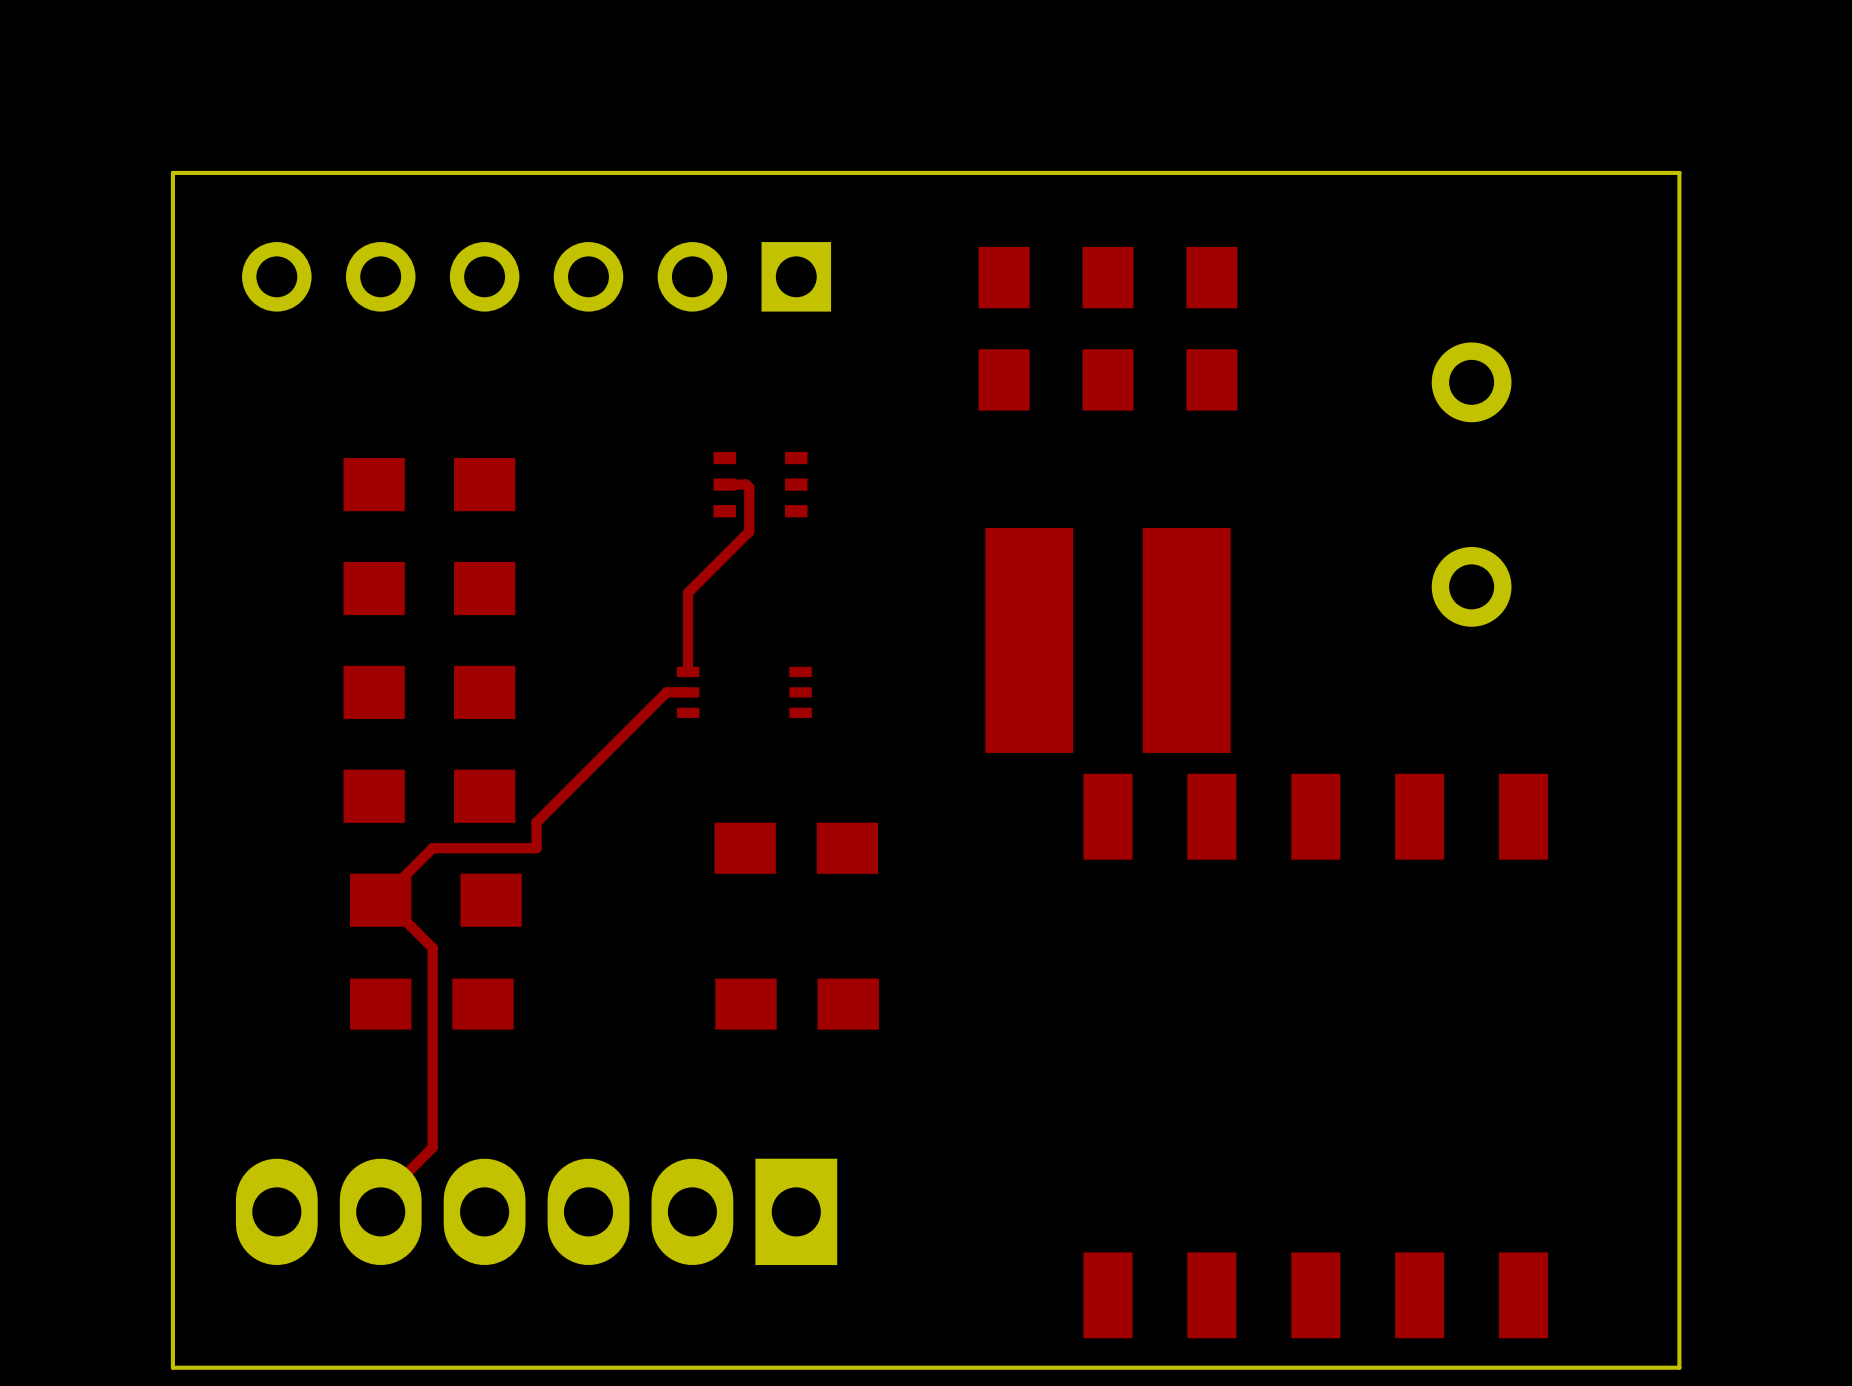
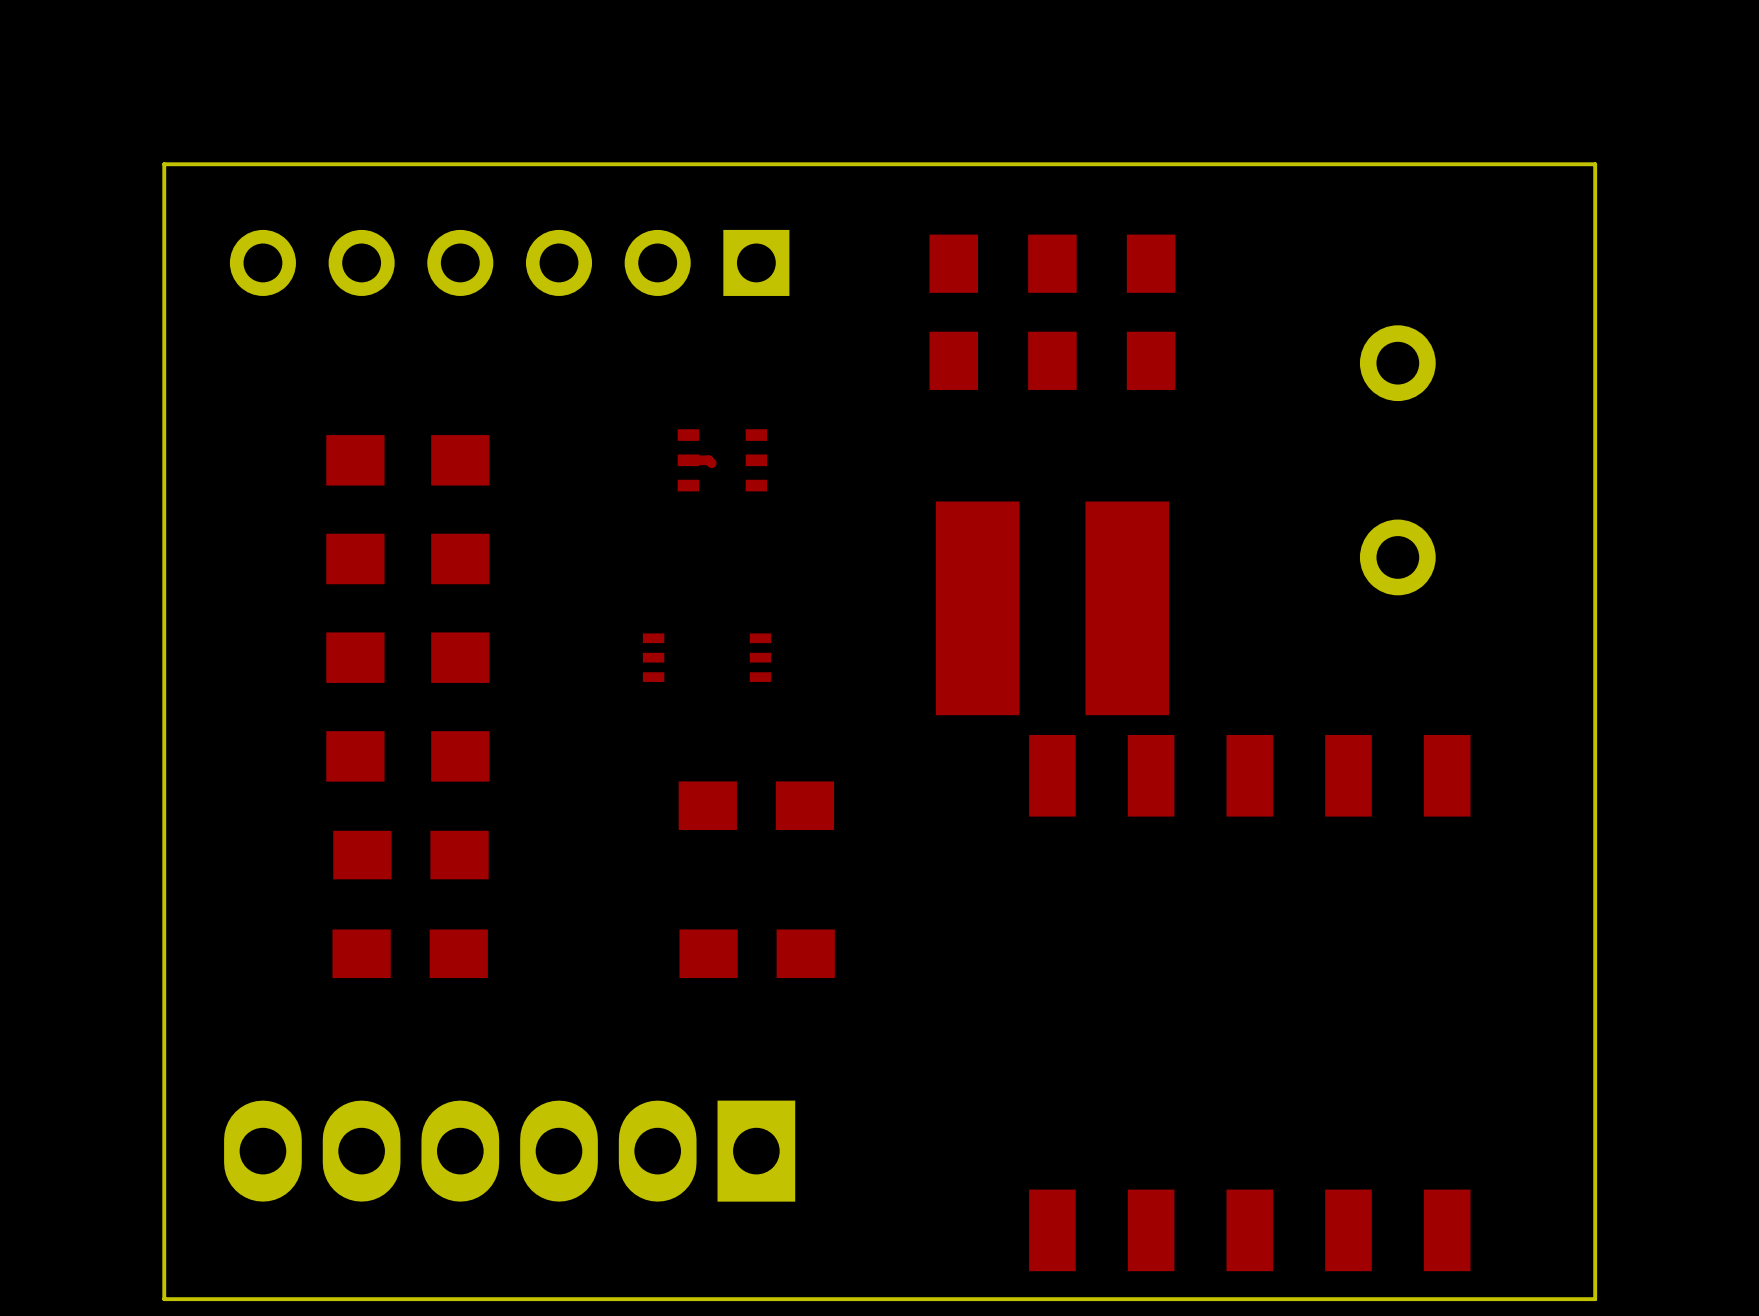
top track: (749, 487) (749, 531) (688, 592) (688, 671) -> none
top track: (688, 692) (666, 692) (536, 822) (536, 848) (432, 848) (380, 900) (384, 900) (432, 948) (432, 1147) (380, 1199) -> none
part footprint: [350, 873, 522, 927] -> [333, 830, 489, 880]

